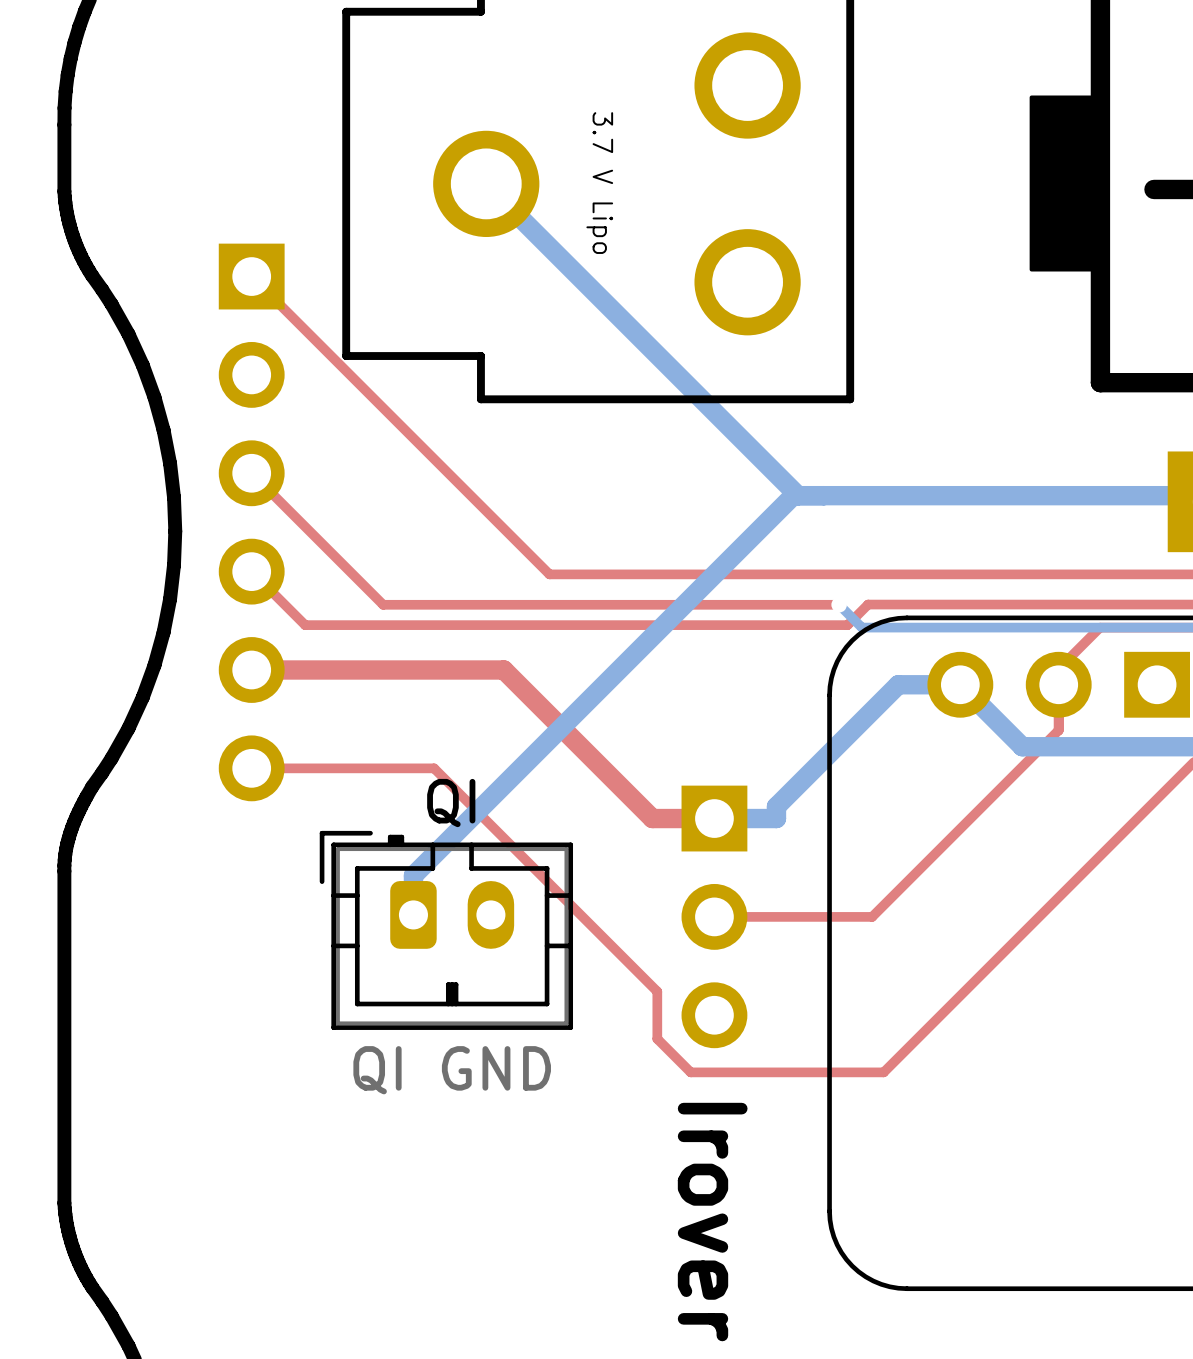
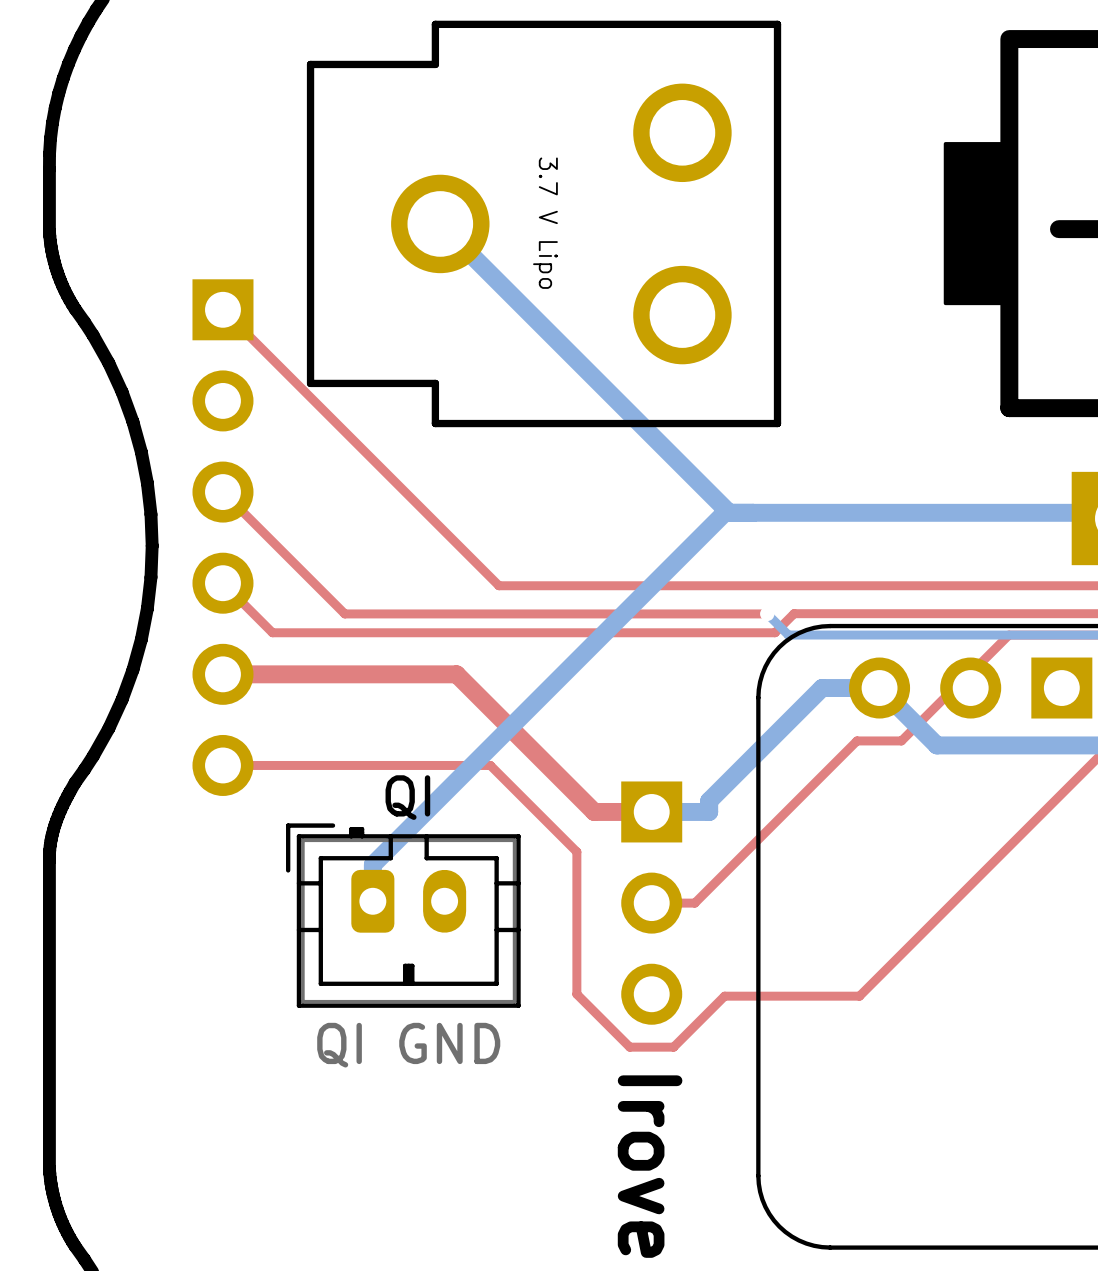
top track: (1058, 684) (1058, 730) (872, 916) (761, 916) -> (970, 687) (954, 687) (901, 740) (857, 740) (694, 903)
top track: (434, 768) (657, 991) (657, 1038) -> (391, 765) (490, 765) (576, 851) (576, 994) (598, 1016)
top track: (938, 1017) (883, 1072) (738, 1072) -> (859, 996) (724, 996) (673, 1047)

